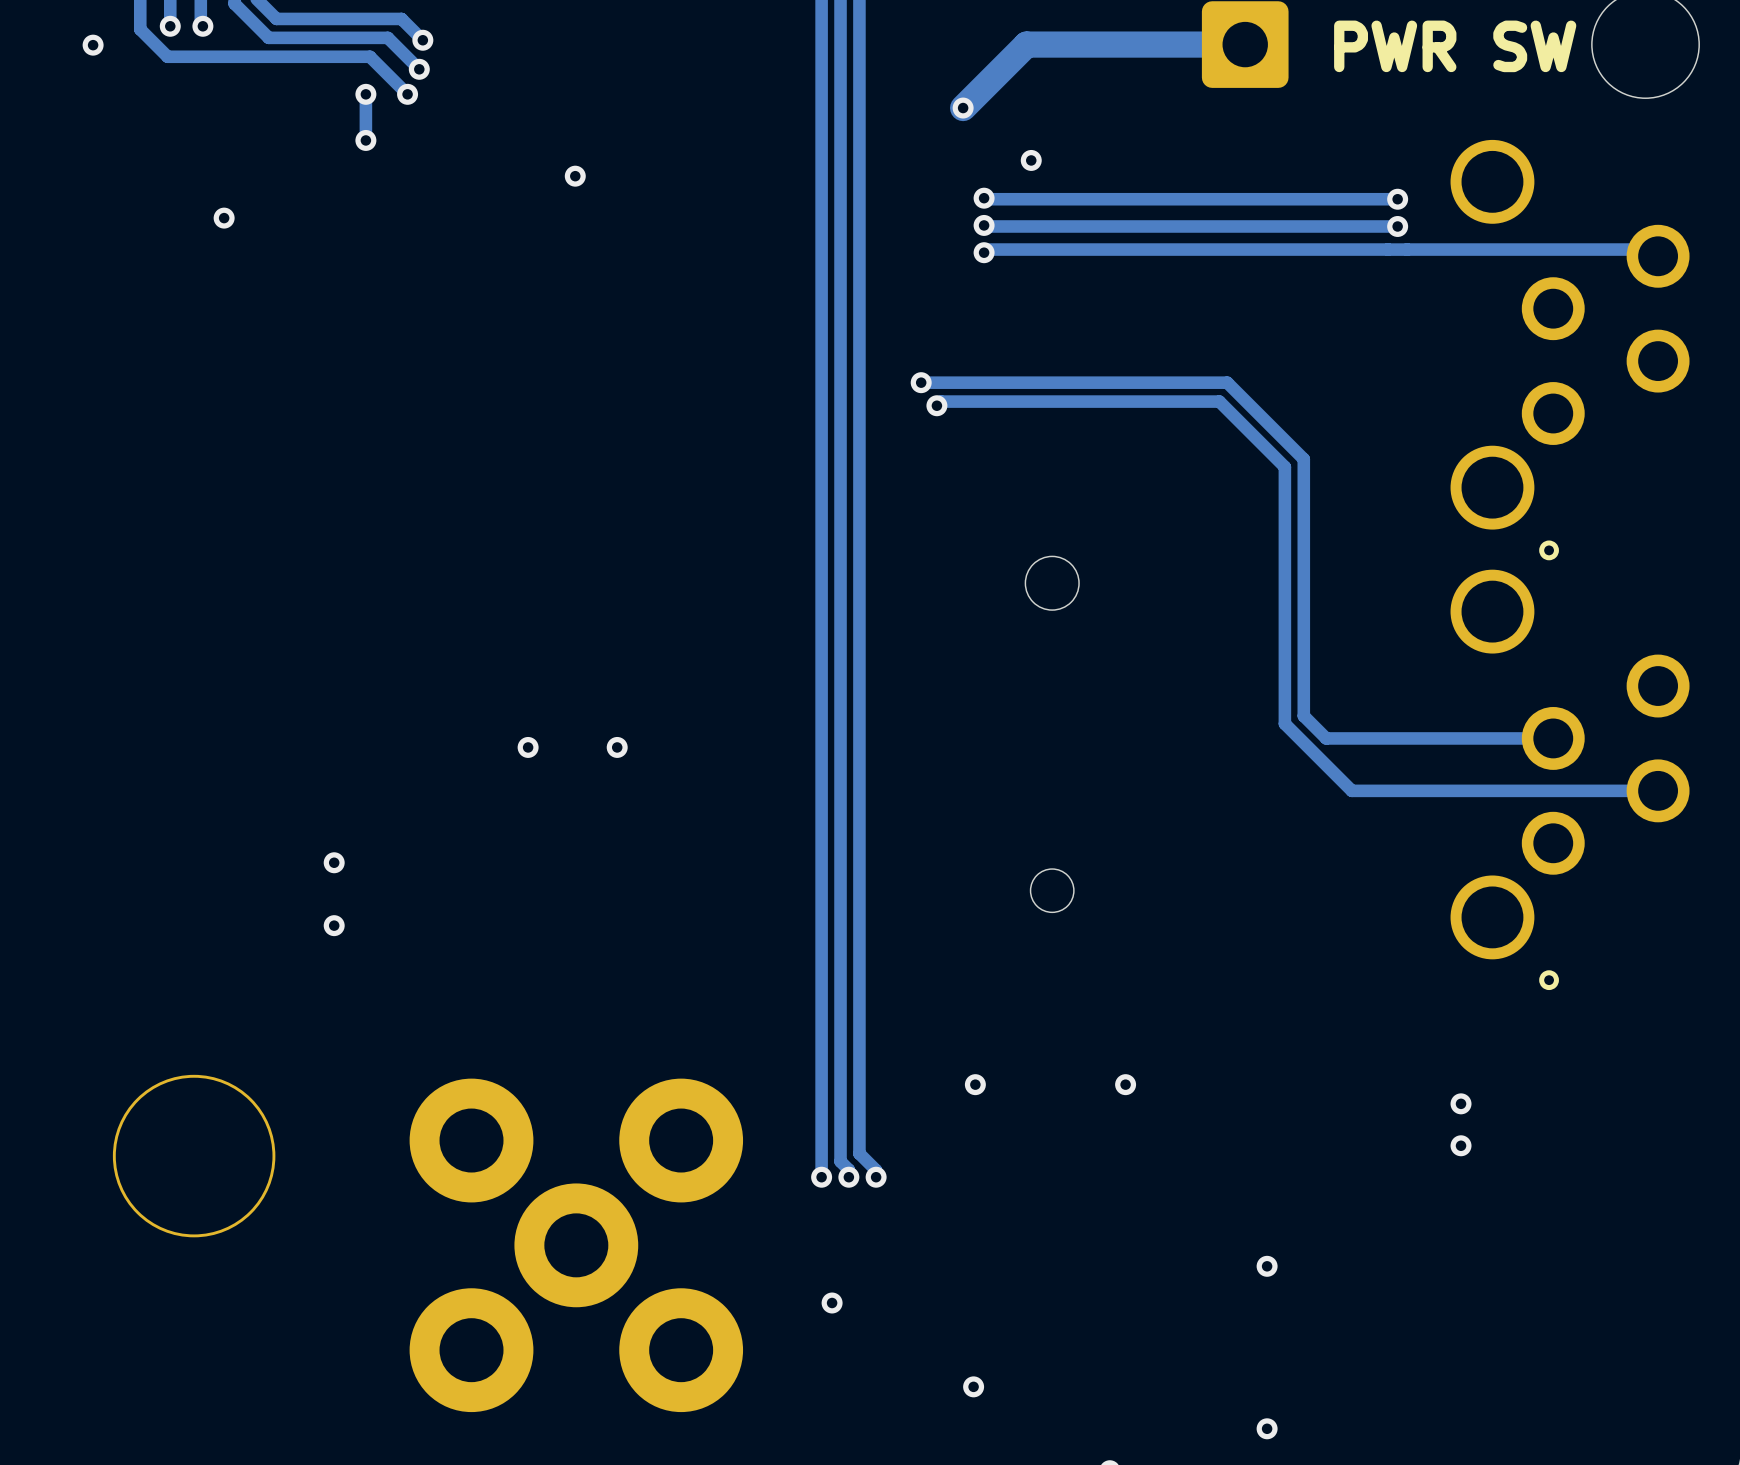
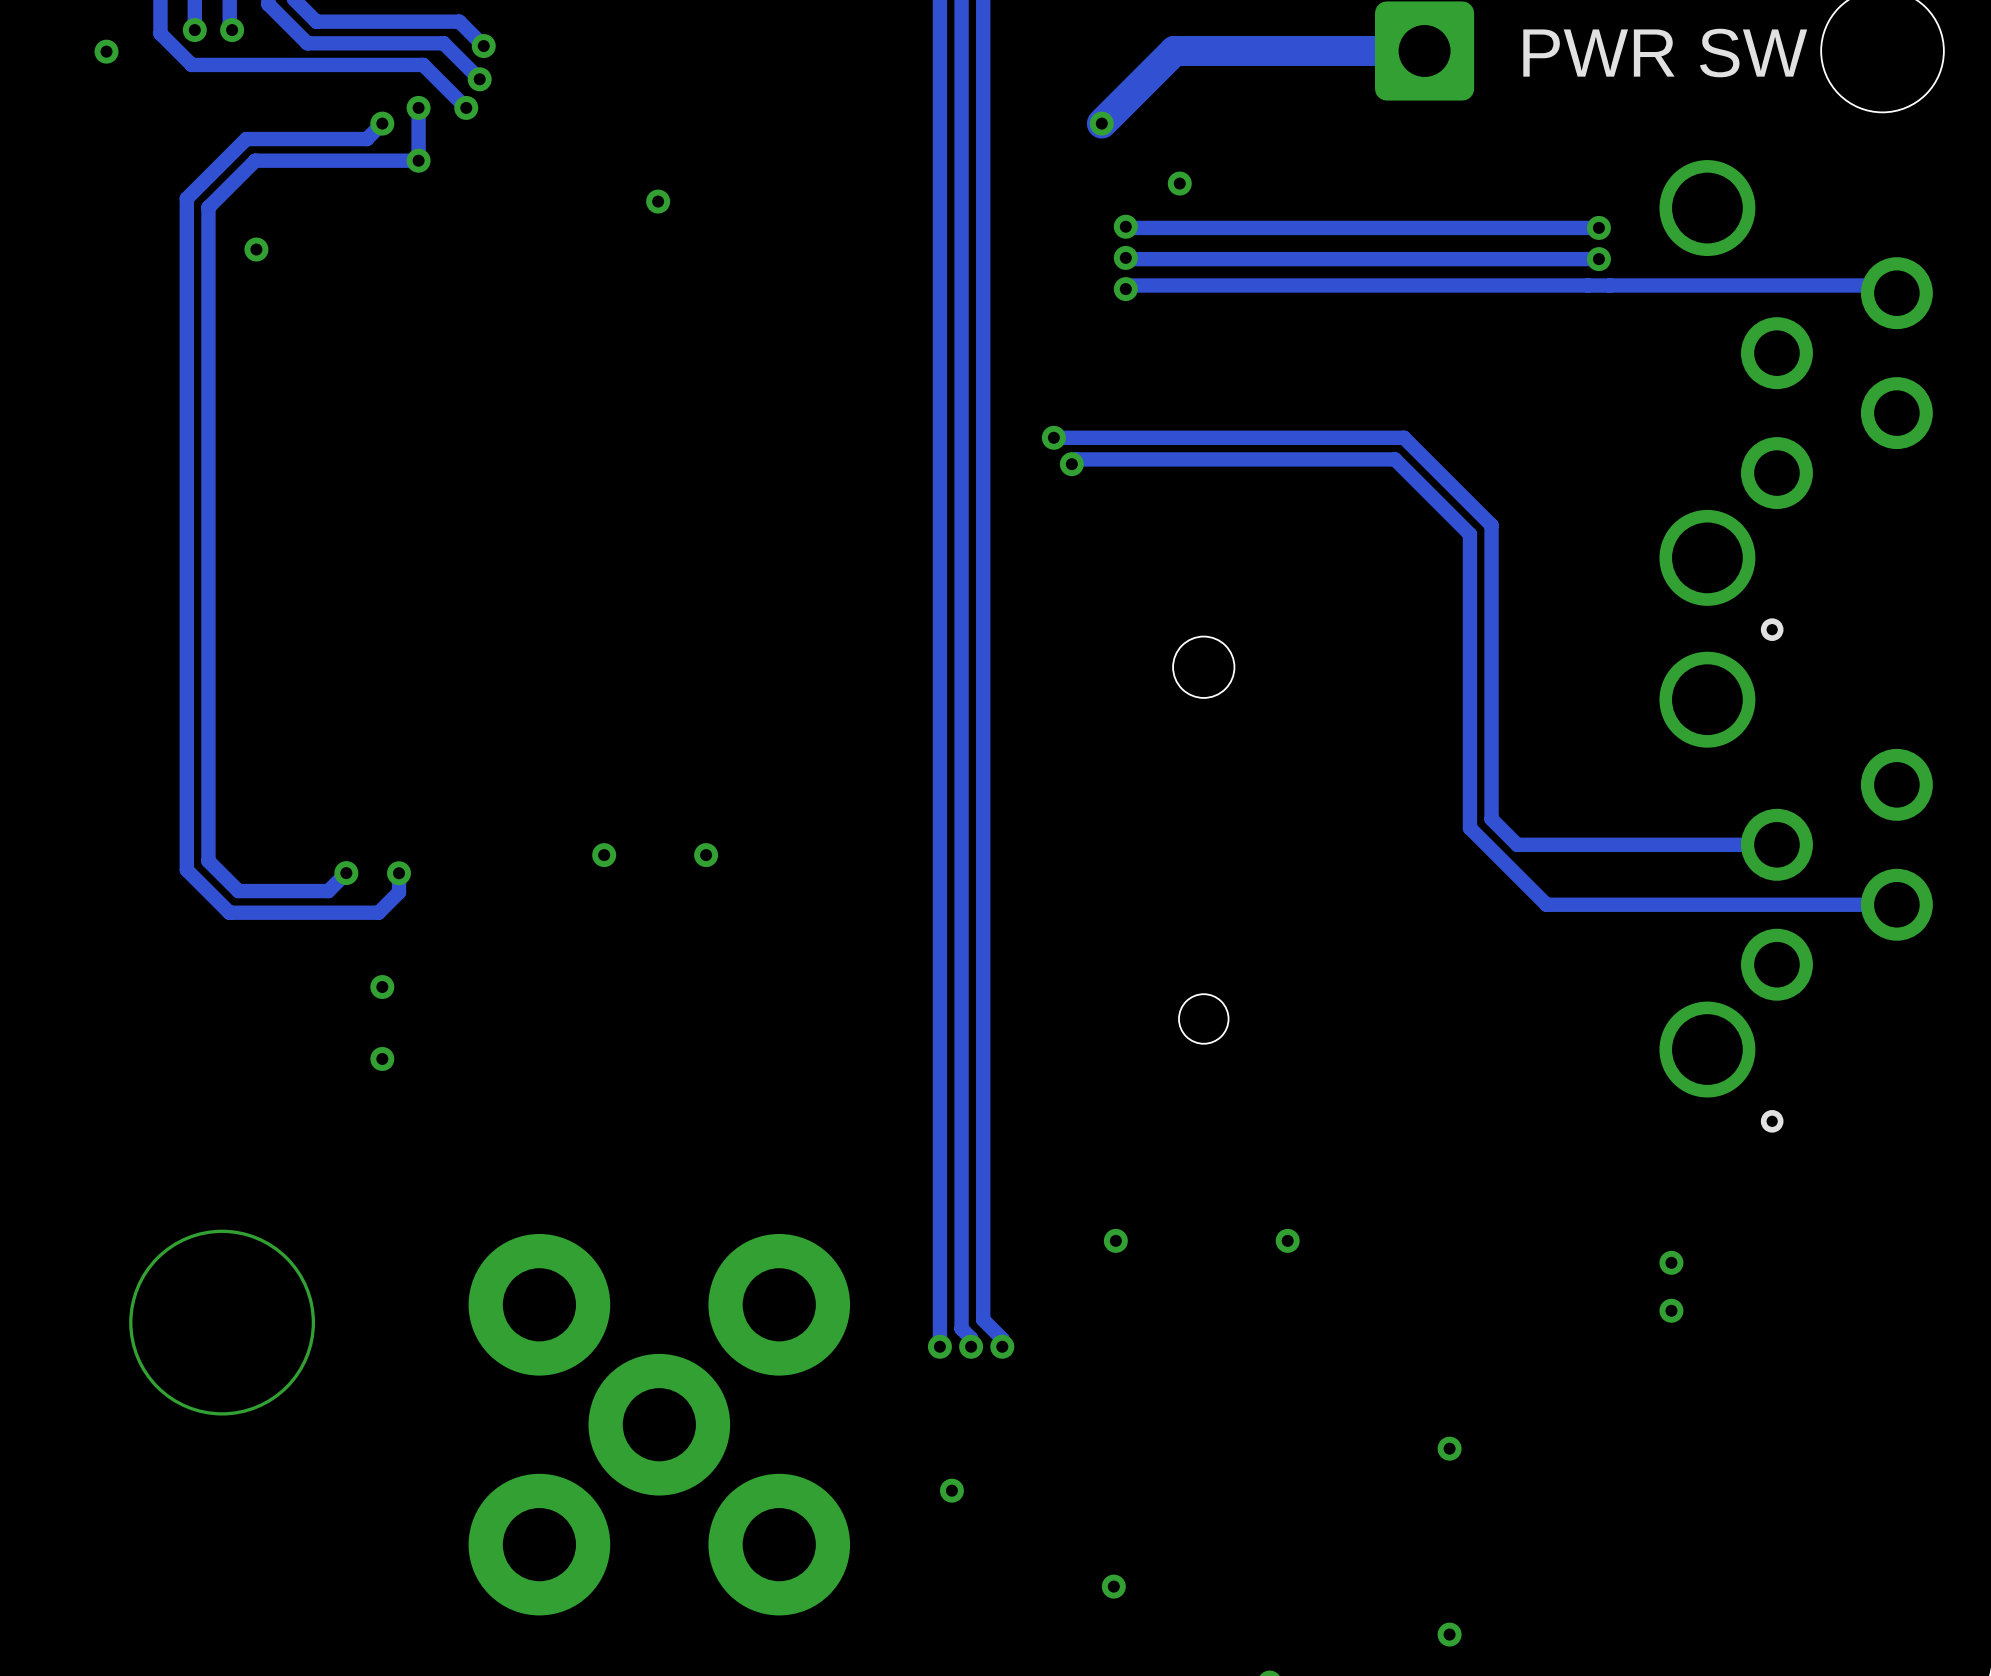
track: none -> (382, 123) (366, 139) (246, 139) (186, 198) (186, 870) (229, 912) (378, 912) (399, 892) (399, 873)
via: none -> (382, 123)
track: none -> (418, 160) (255, 160) (208, 207) (208, 861) (238, 891) (328, 891) (346, 873)
via: none -> (346, 873)
via: none -> (399, 873)

